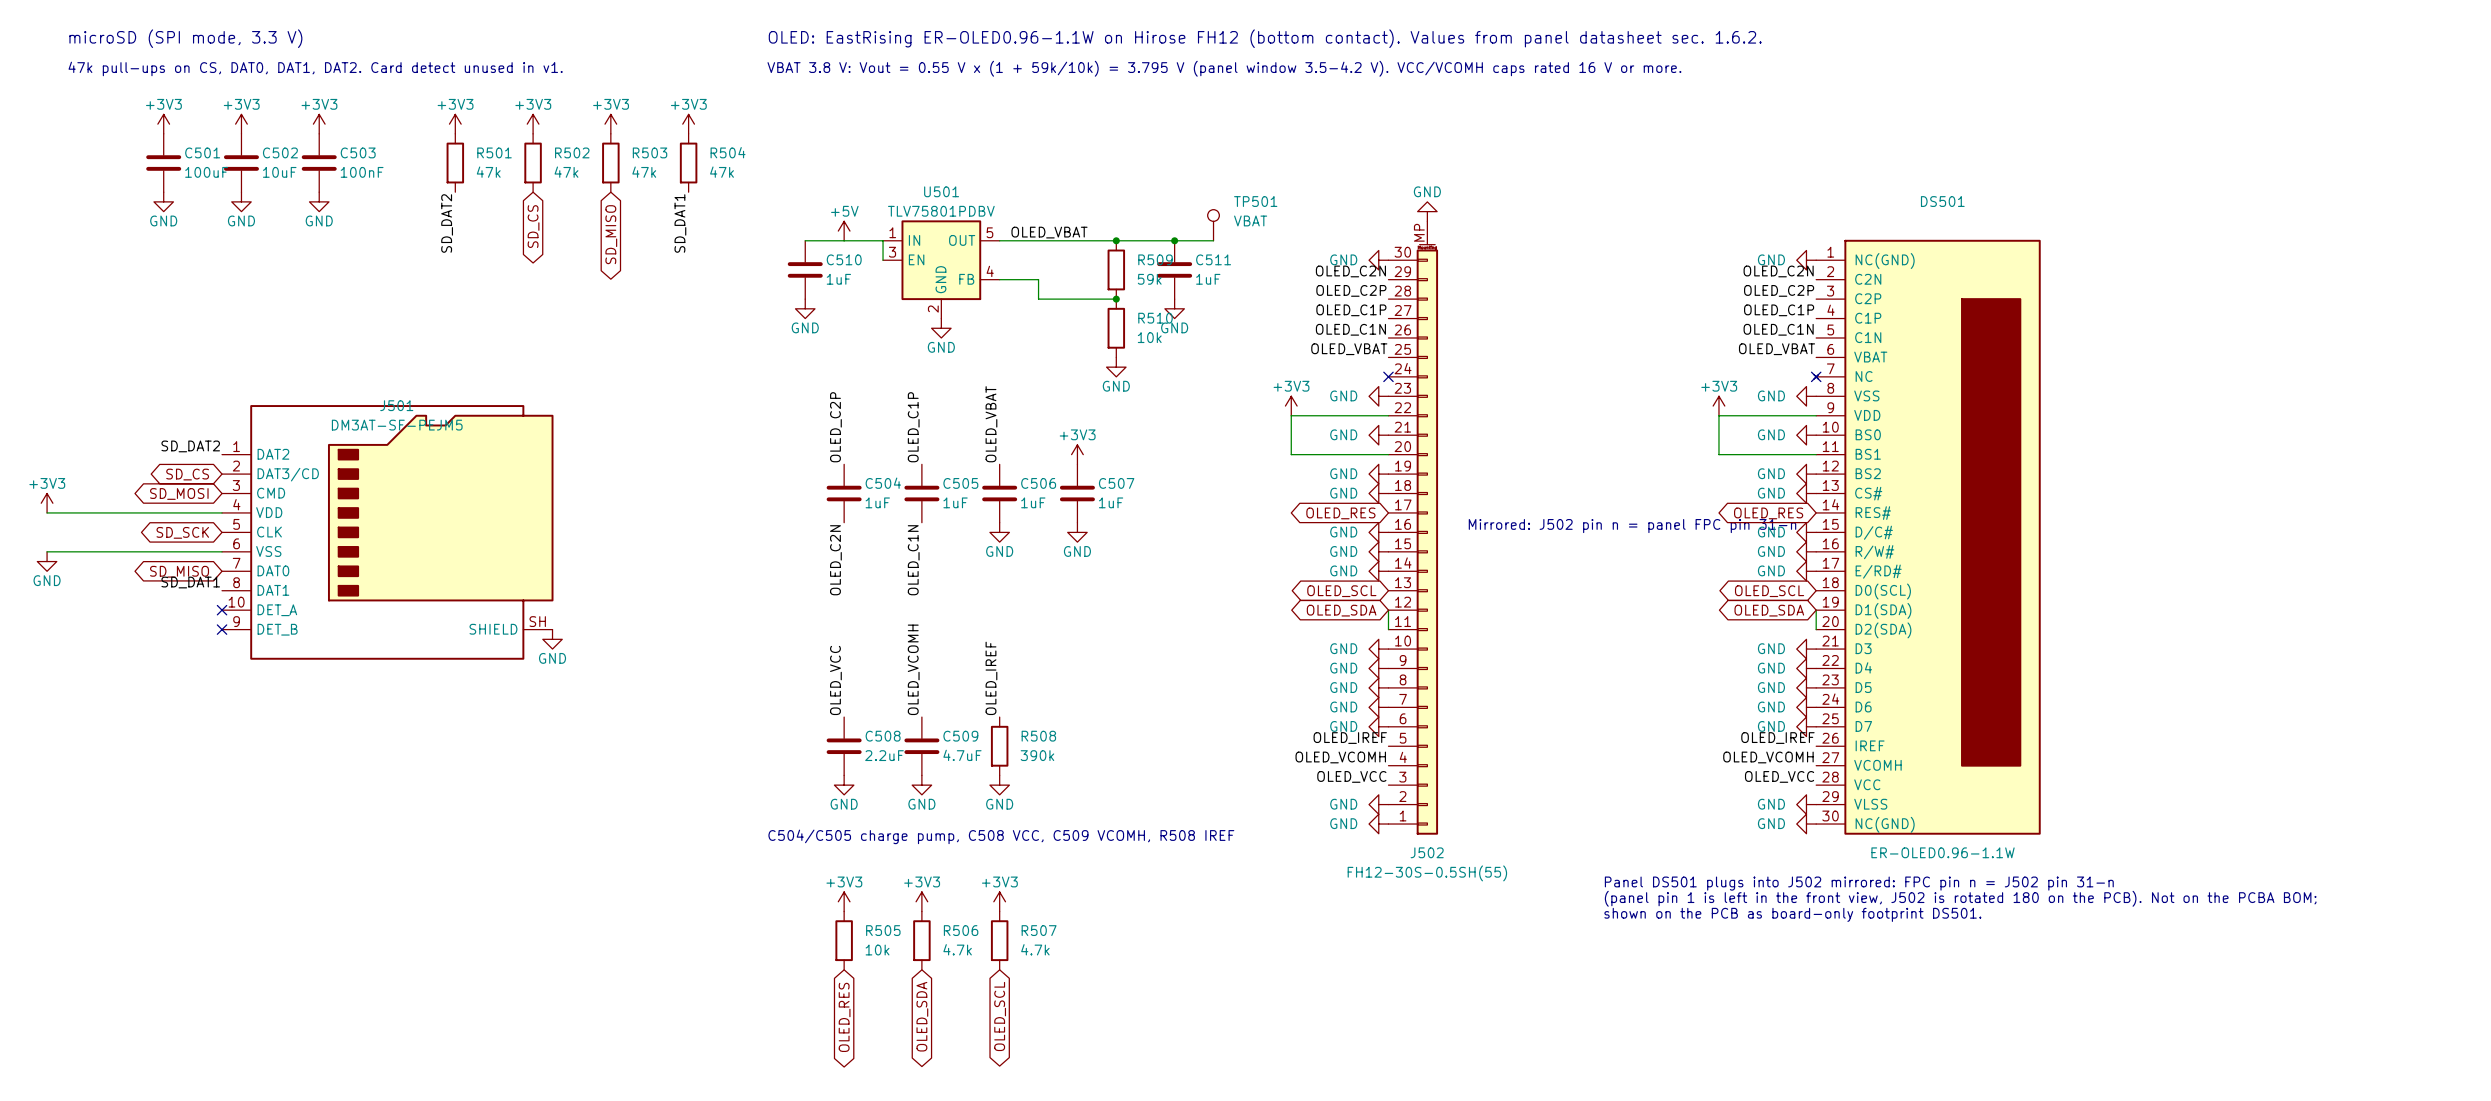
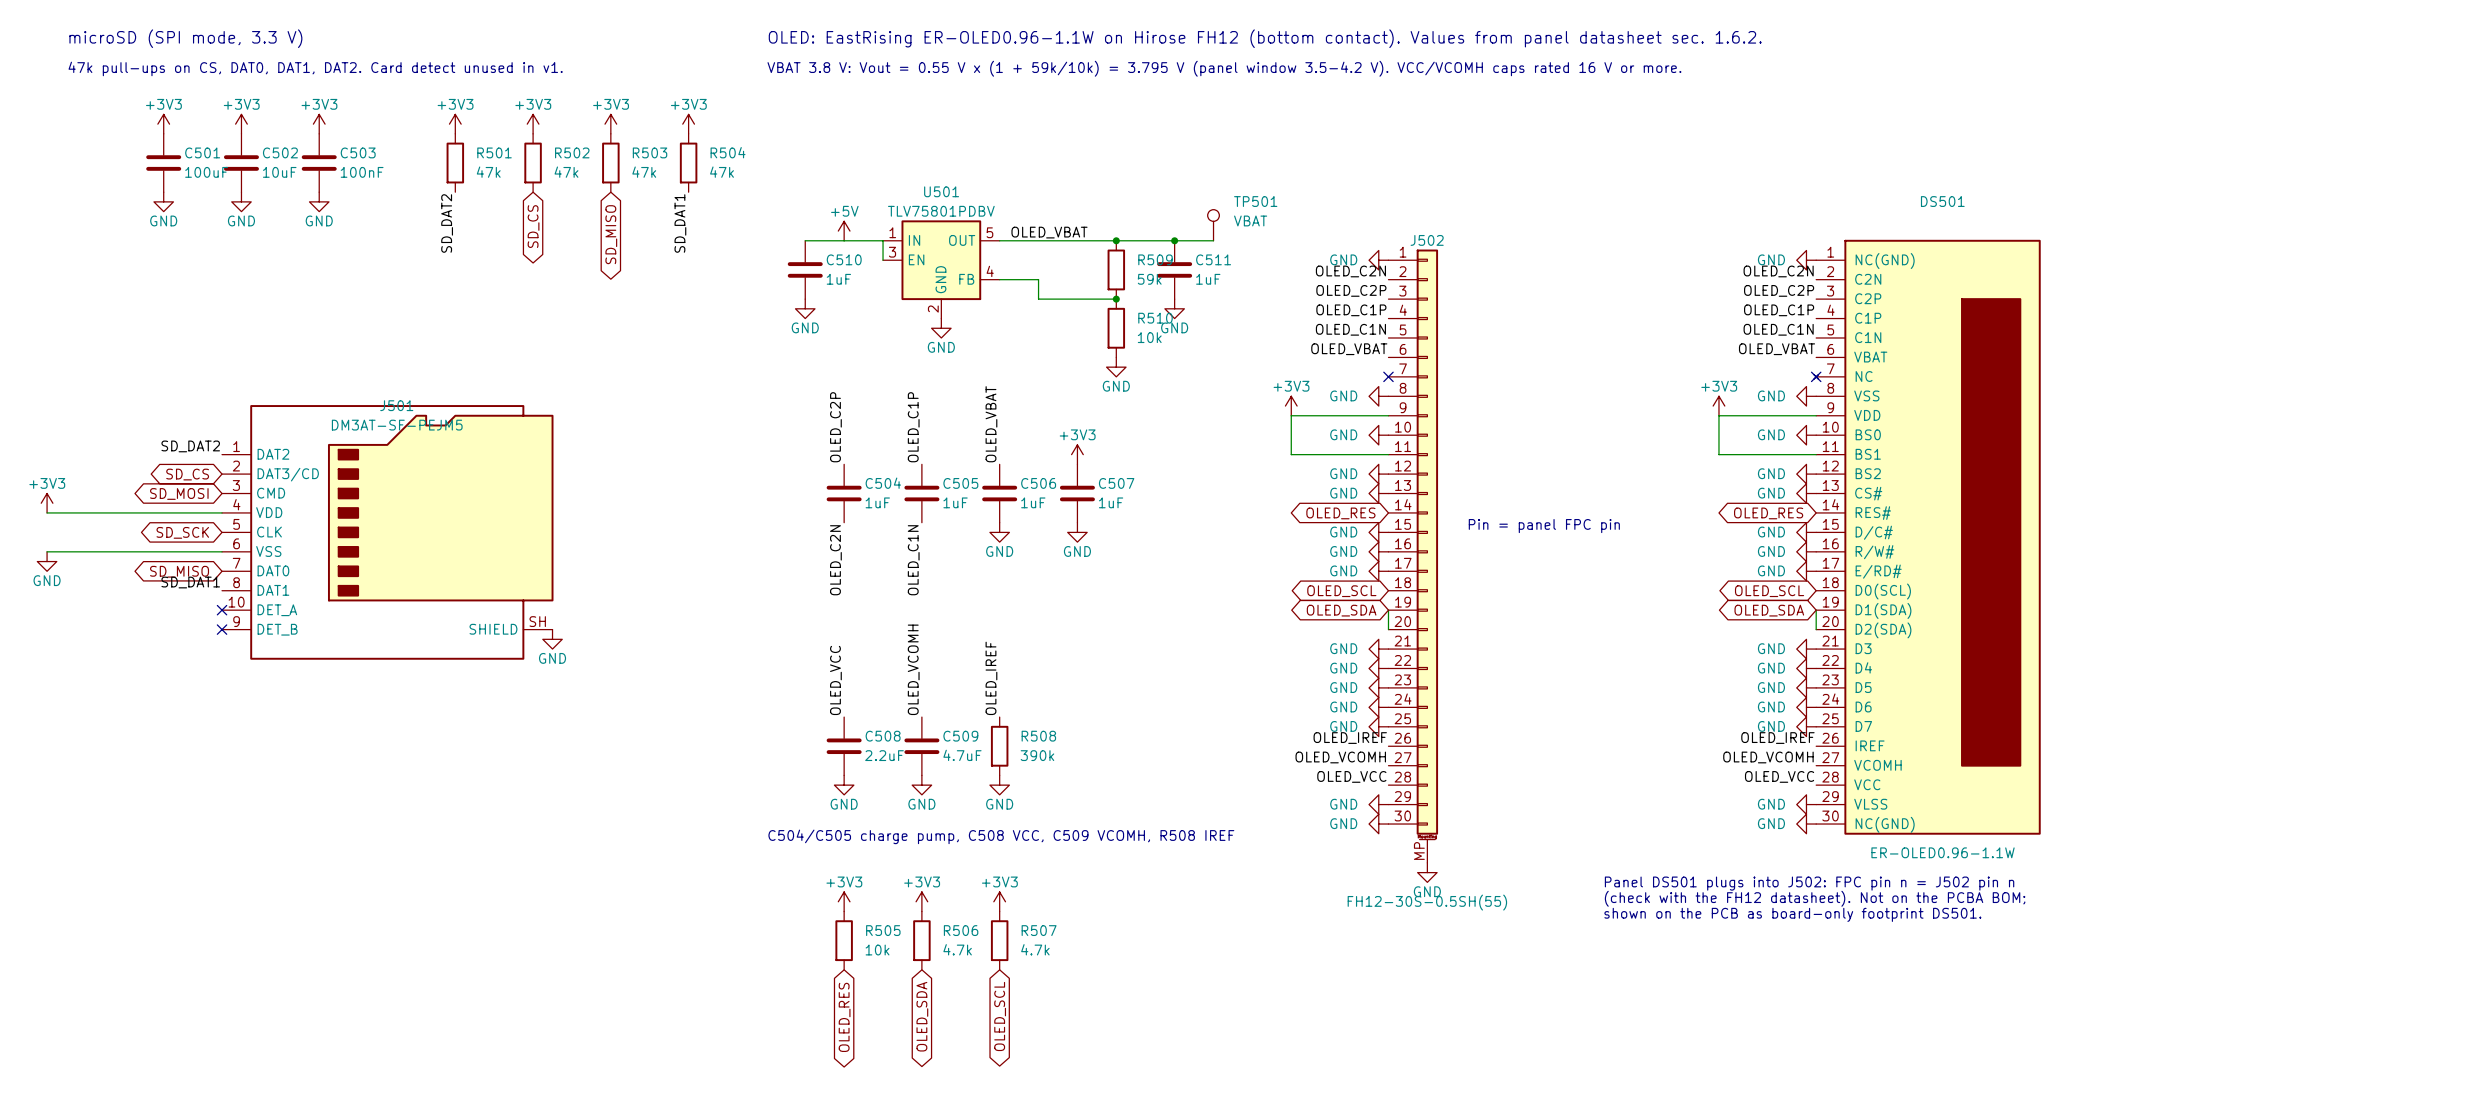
power symbol: GND (1427, 211) -> none
text: Mirrored: J502 pin n = panel FPC pin 31-n (1632, 526) -> Pin = panel FPC pin (1544, 526)
J502 flip: as is (1427, 539) -> up-down (1427, 544)
power symbol: none -> GND (1427, 872)
text: Panel DS501 plugs into J502 mirrored: FPC pin n = J502 pin 31-n (1859, 883) -> Panel DS501 plugs into J502: FPC pin n = J502 pin n (1809, 883)
text: (panel pin 1 is left in the front view, J502 is rotated 180 on the PCB). Not on the PCBA BOM; (1960, 898) -> (check with the FH12 datasheet). Not on the PCBA BOM; (1815, 898)

